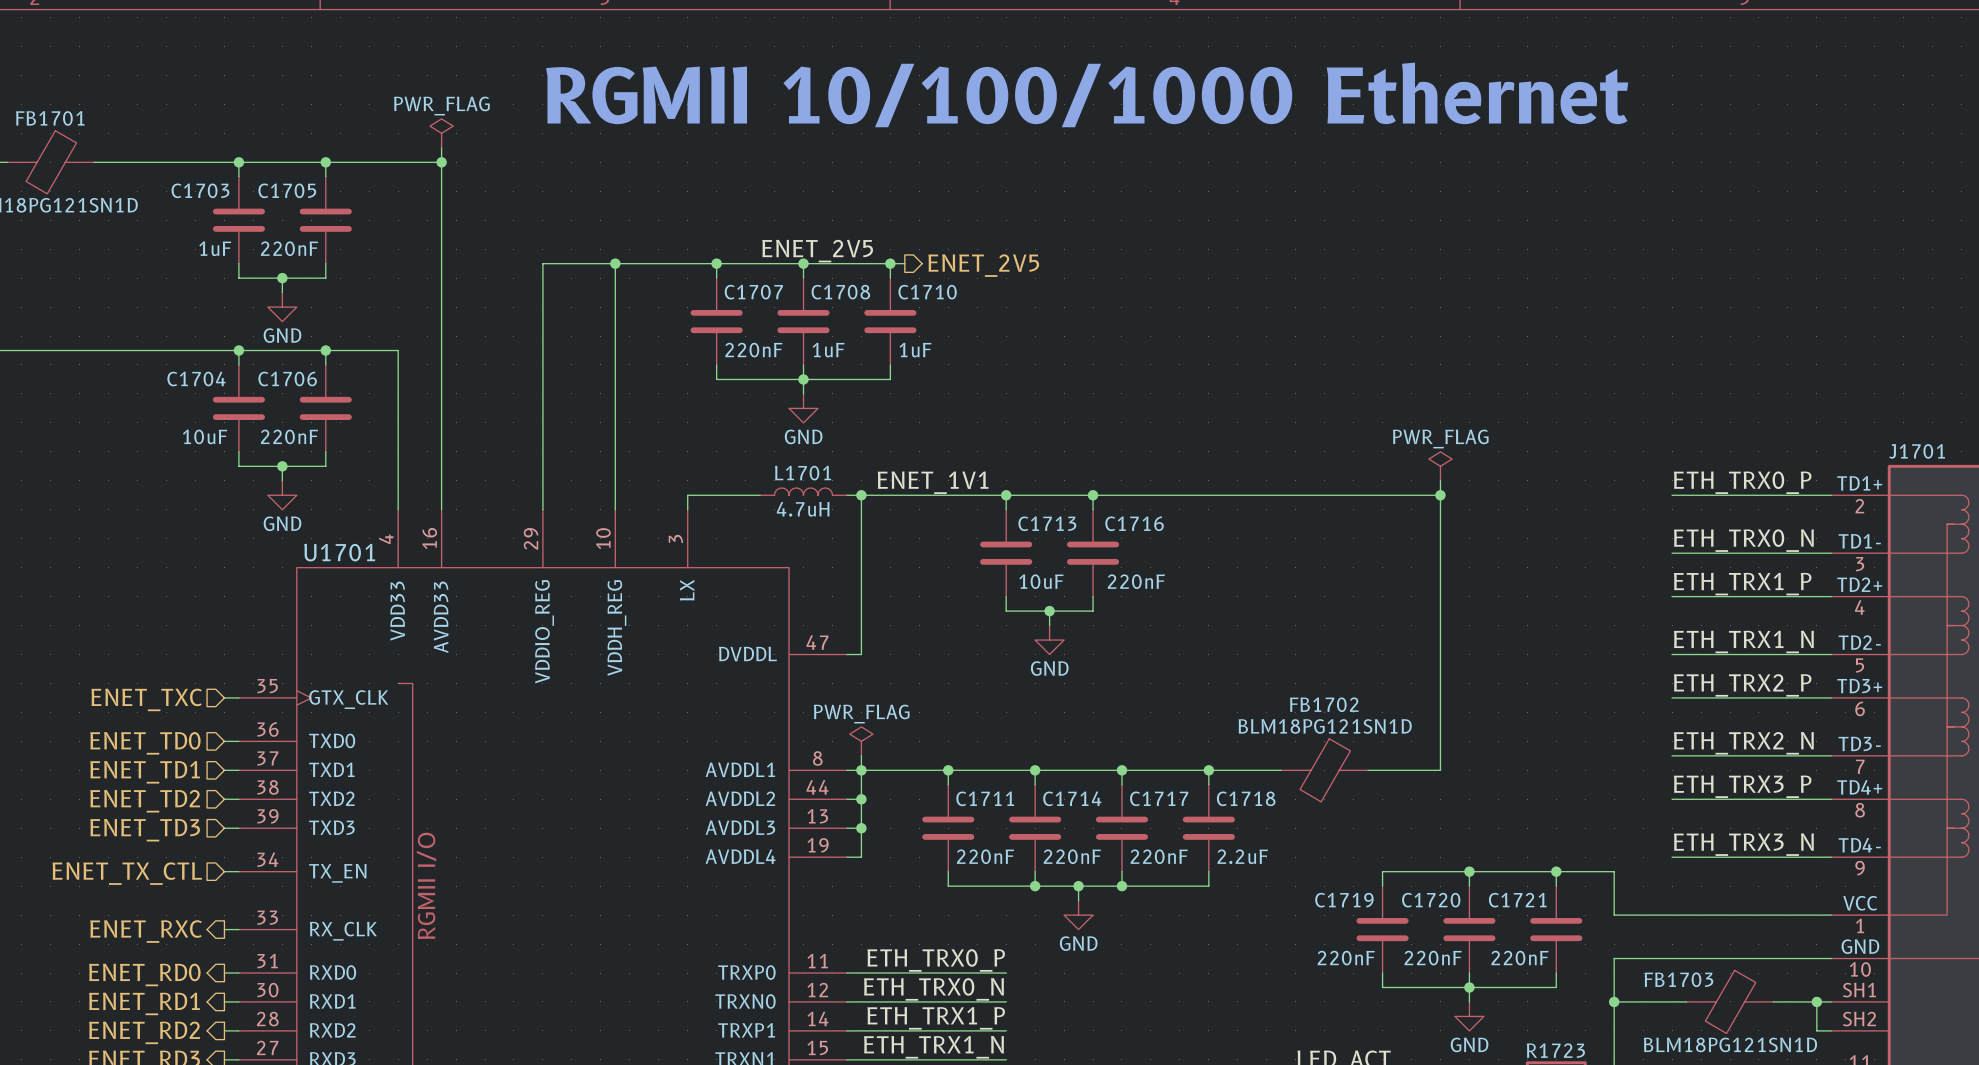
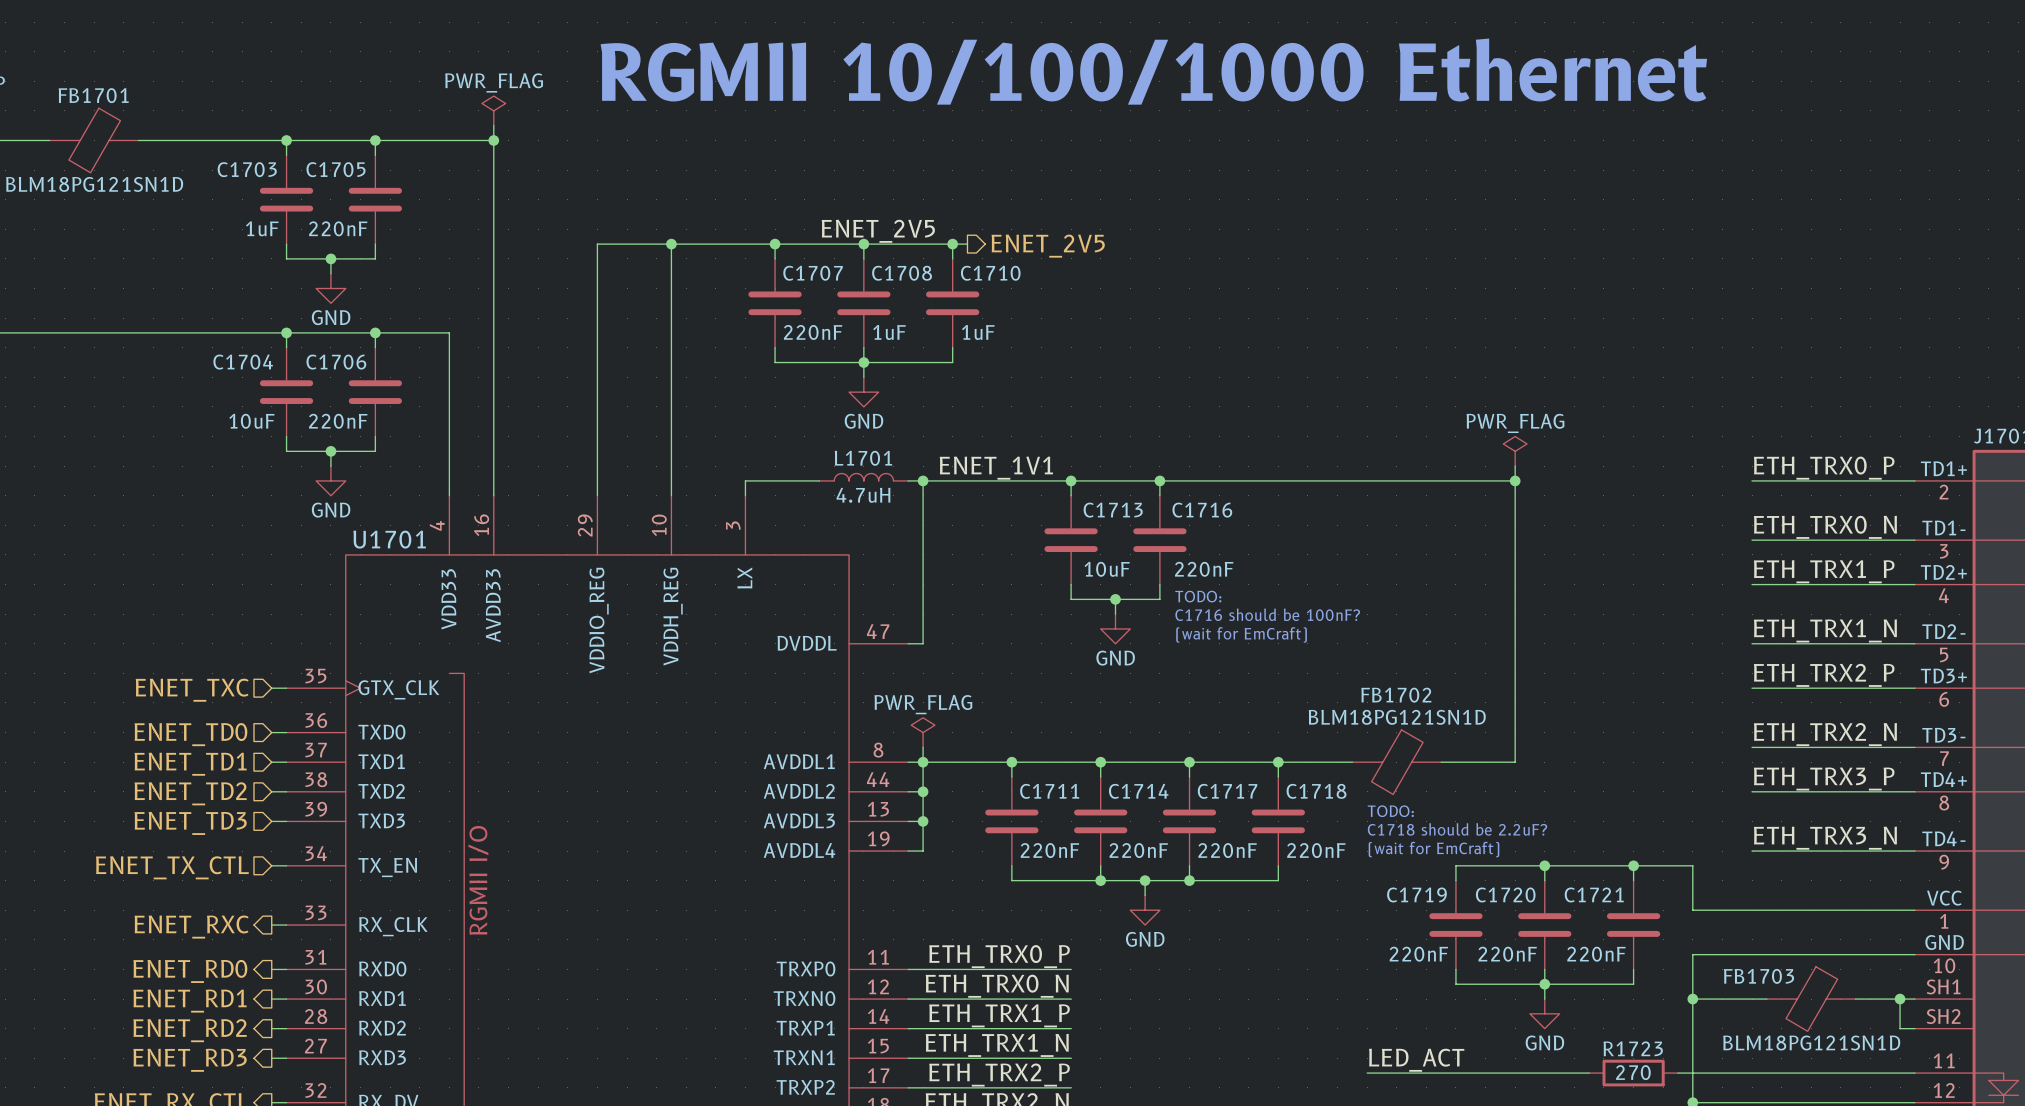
text: none -> TODO: (1198, 596)
text: none -> C1716 should be 100nF? (1267, 614)
text: none -> (wait for EmCraft) (1241, 634)
text: none -> TODO: (1390, 811)
text: none -> C1718 should be 2.2uF? (1457, 829)
text: none -> (wait for EmCraft) (1433, 849)
C1718 value: 2.2uF (1242, 856) -> 220nF (1316, 850)

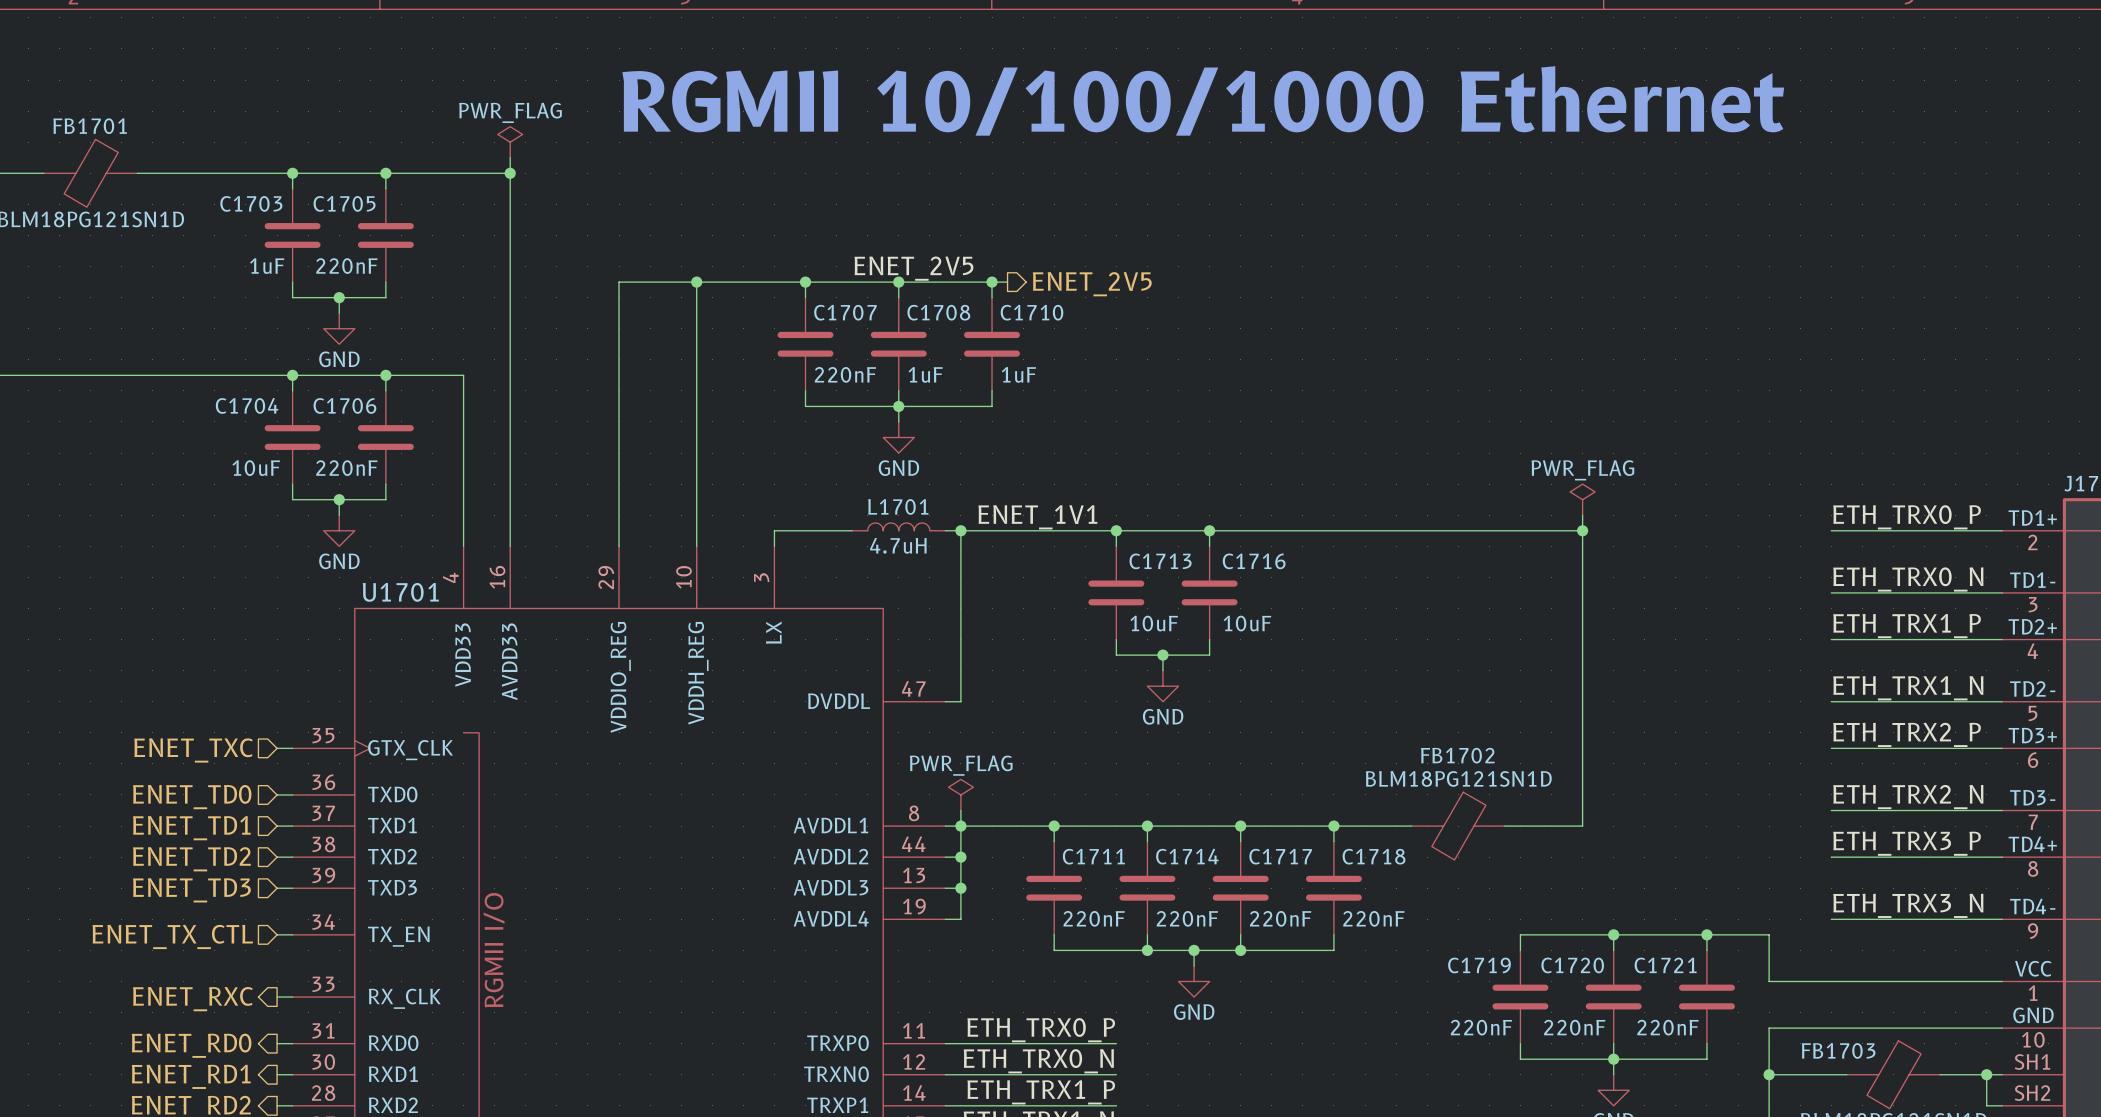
C1716 value: 220nF (1204, 569) -> 10uF (1247, 623)
text: TODO: (1198, 596) -> none
text: C1716 should be 100nF? (1267, 614) -> none
text: (wait for EmCraft) (1241, 634) -> none
text: TODO: (1390, 811) -> none
text: C1718 should be 2.2uF? (1457, 829) -> none
text: (wait for EmCraft) (1433, 849) -> none

